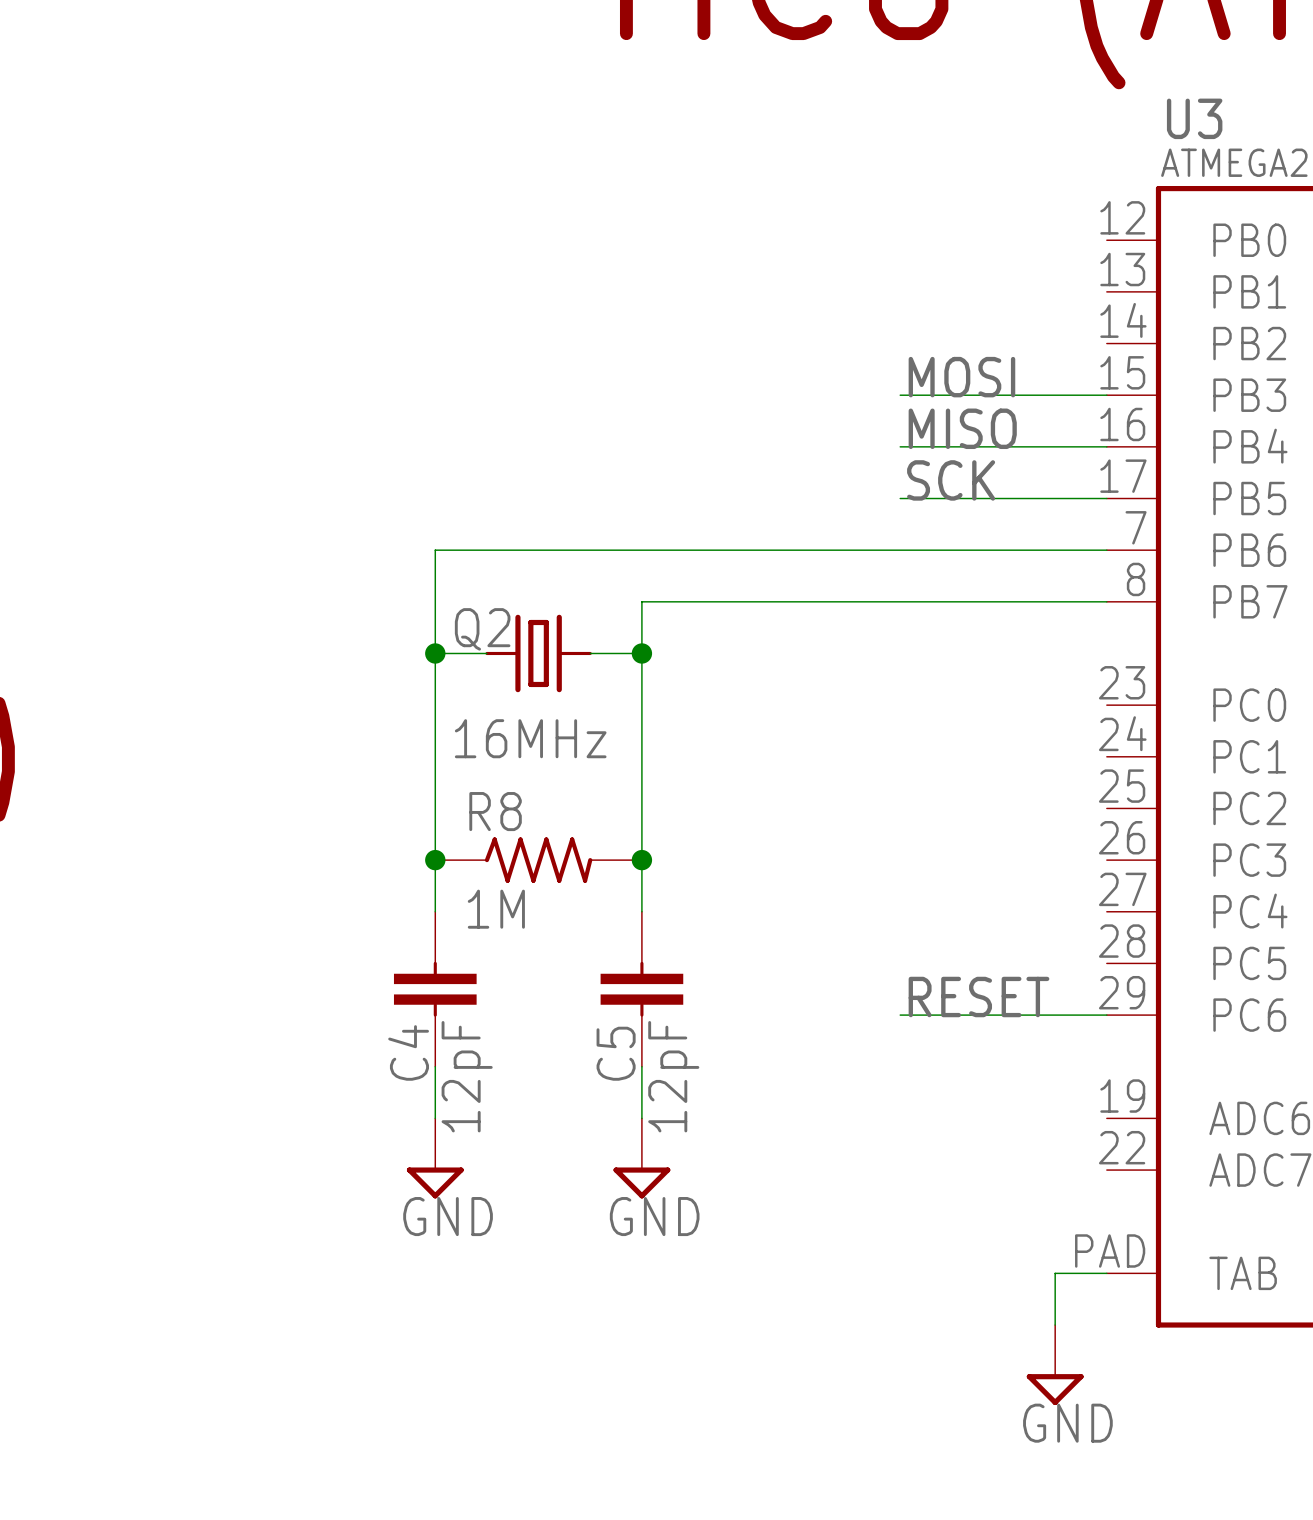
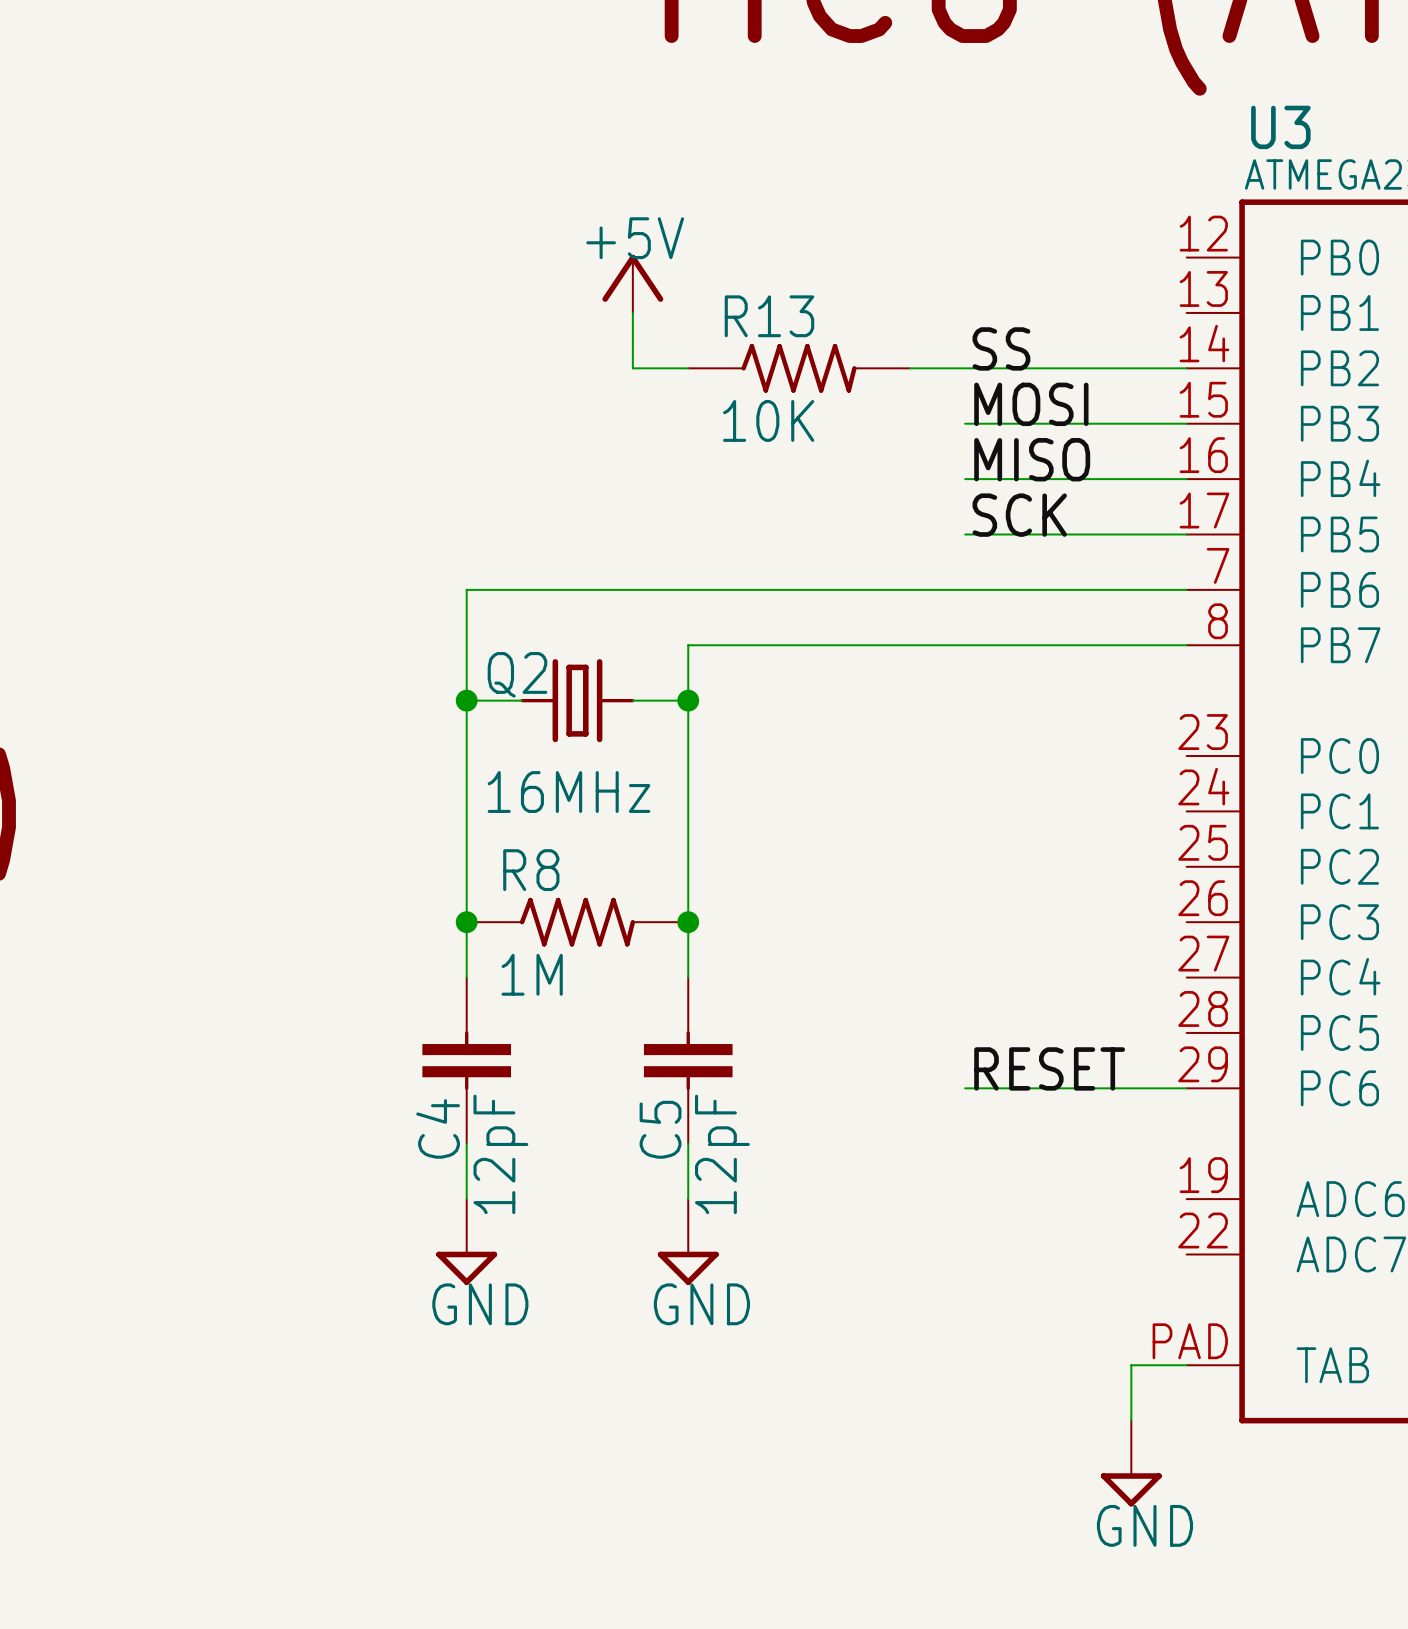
power symbol: none -> +5V (632, 283)
wire: none -> (632, 312) (632, 368) (688, 368)
label: none -> SS (1001, 348)
R13: none -> 10K (799, 368)
wire: none -> (909, 368) (1186, 368)

